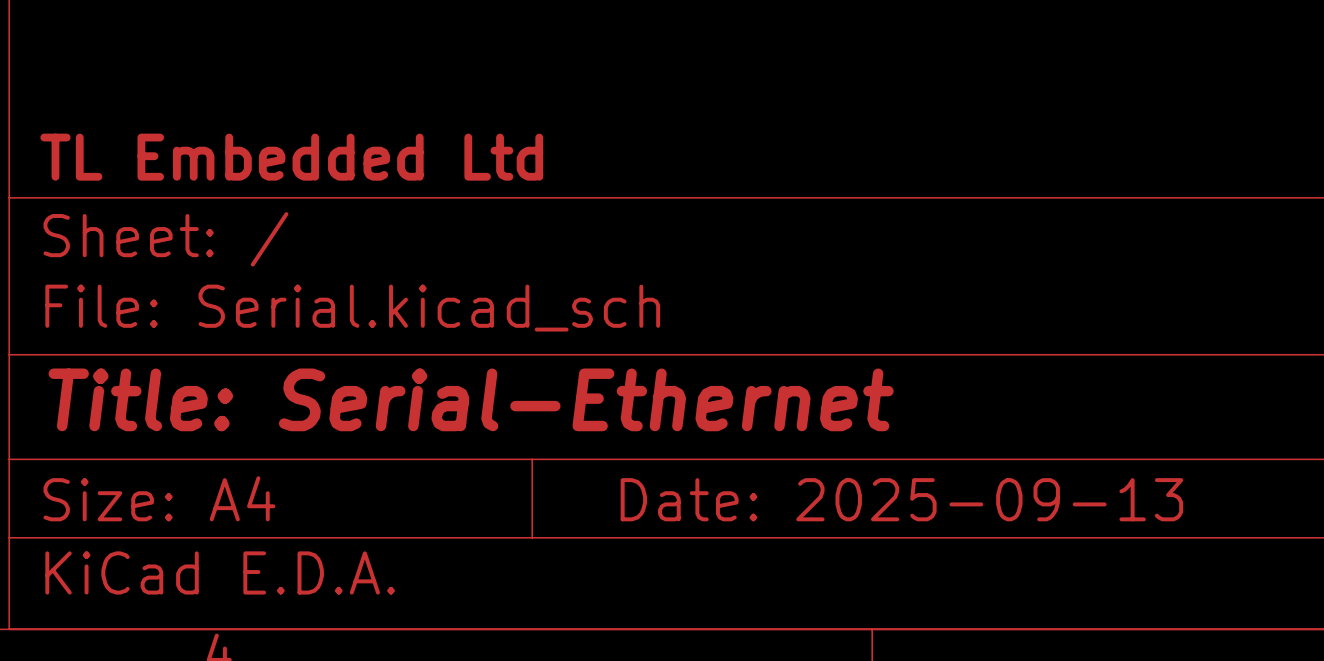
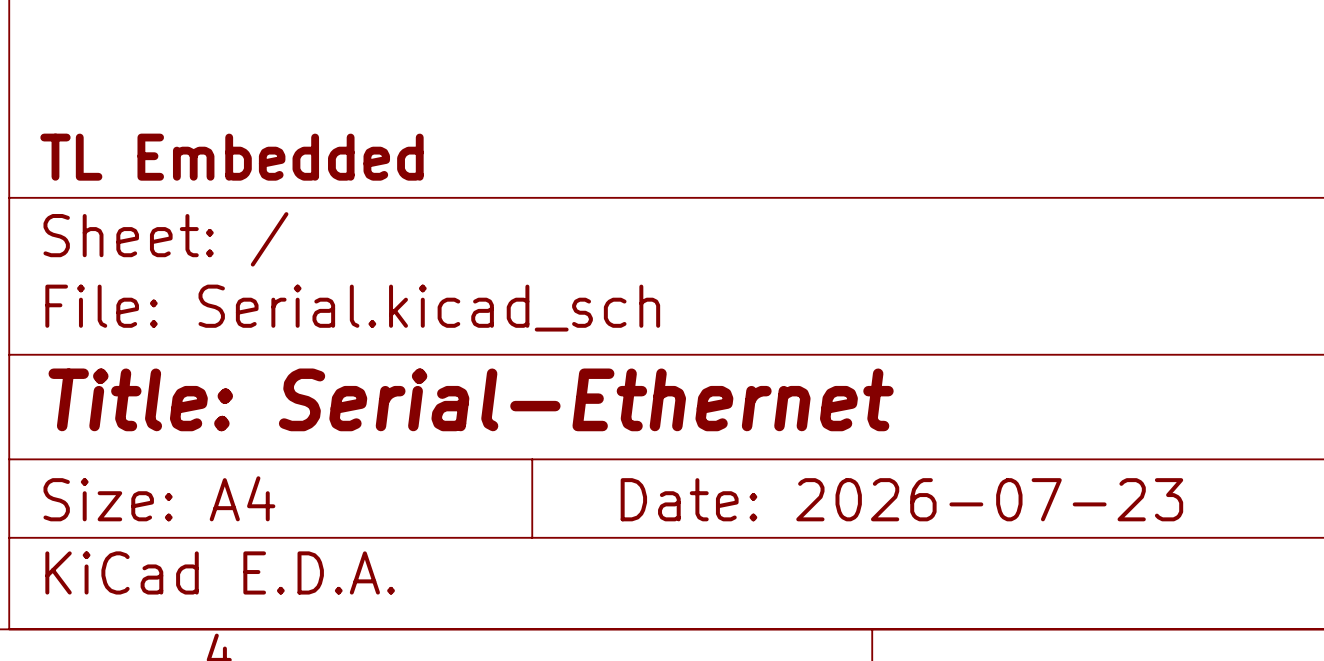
title block: TL Embedded Ltd (291, 157) -> TL Embedded (231, 157)
title block: Date: 2025-09-13 (901, 499) -> Date: 2026-07-23 (901, 499)

